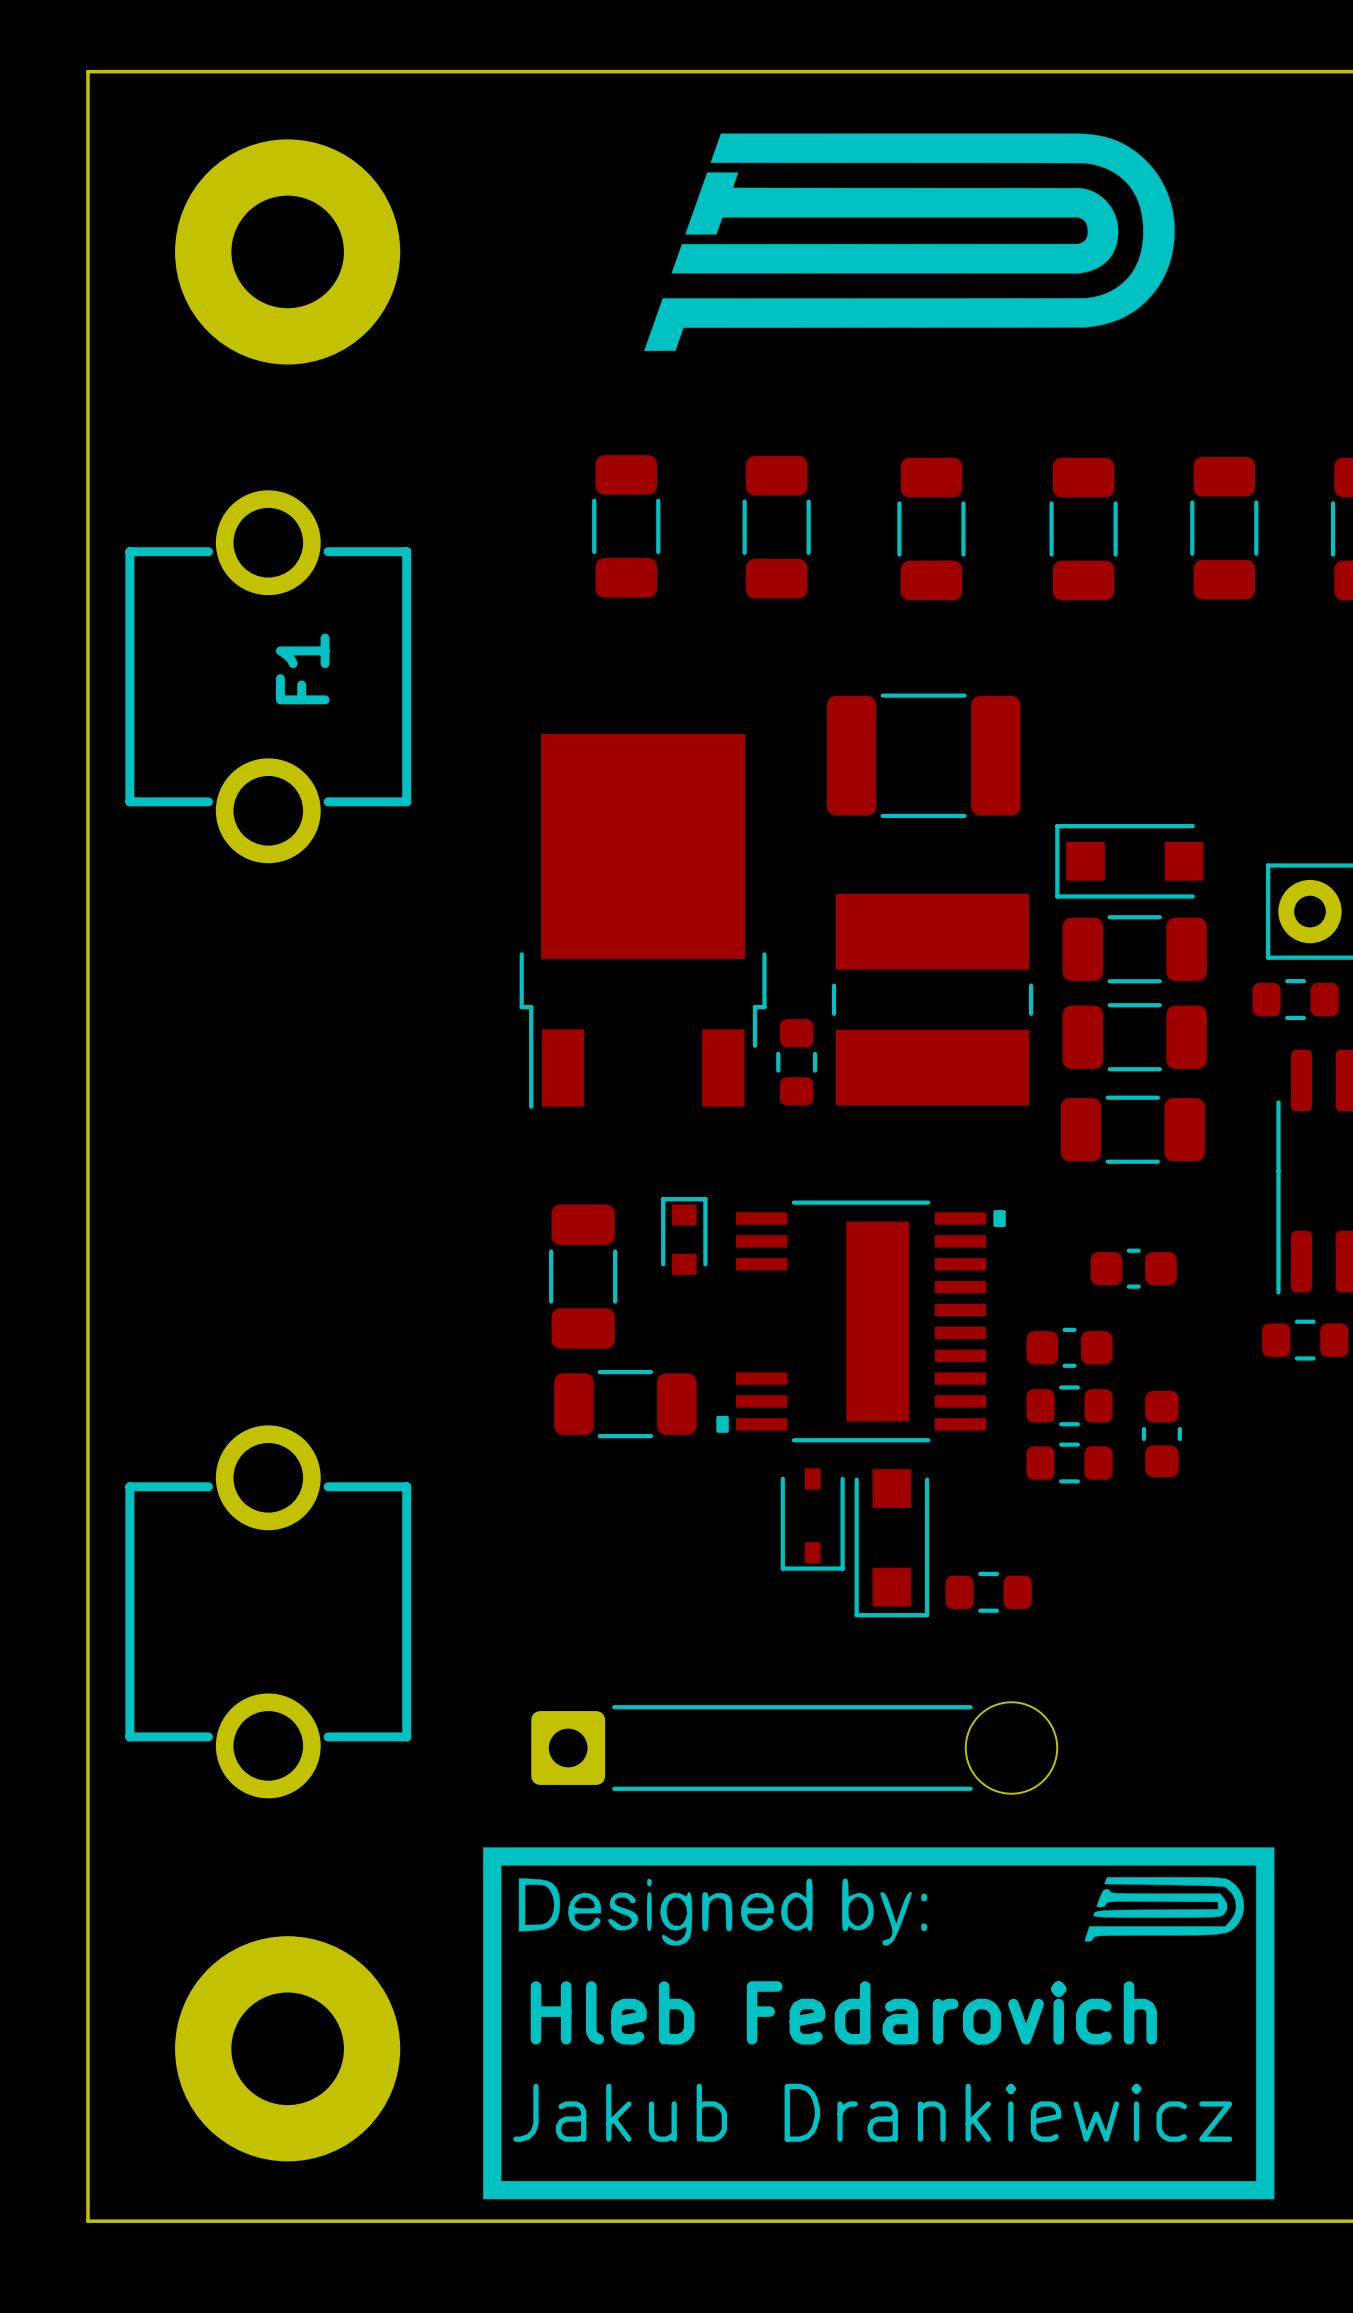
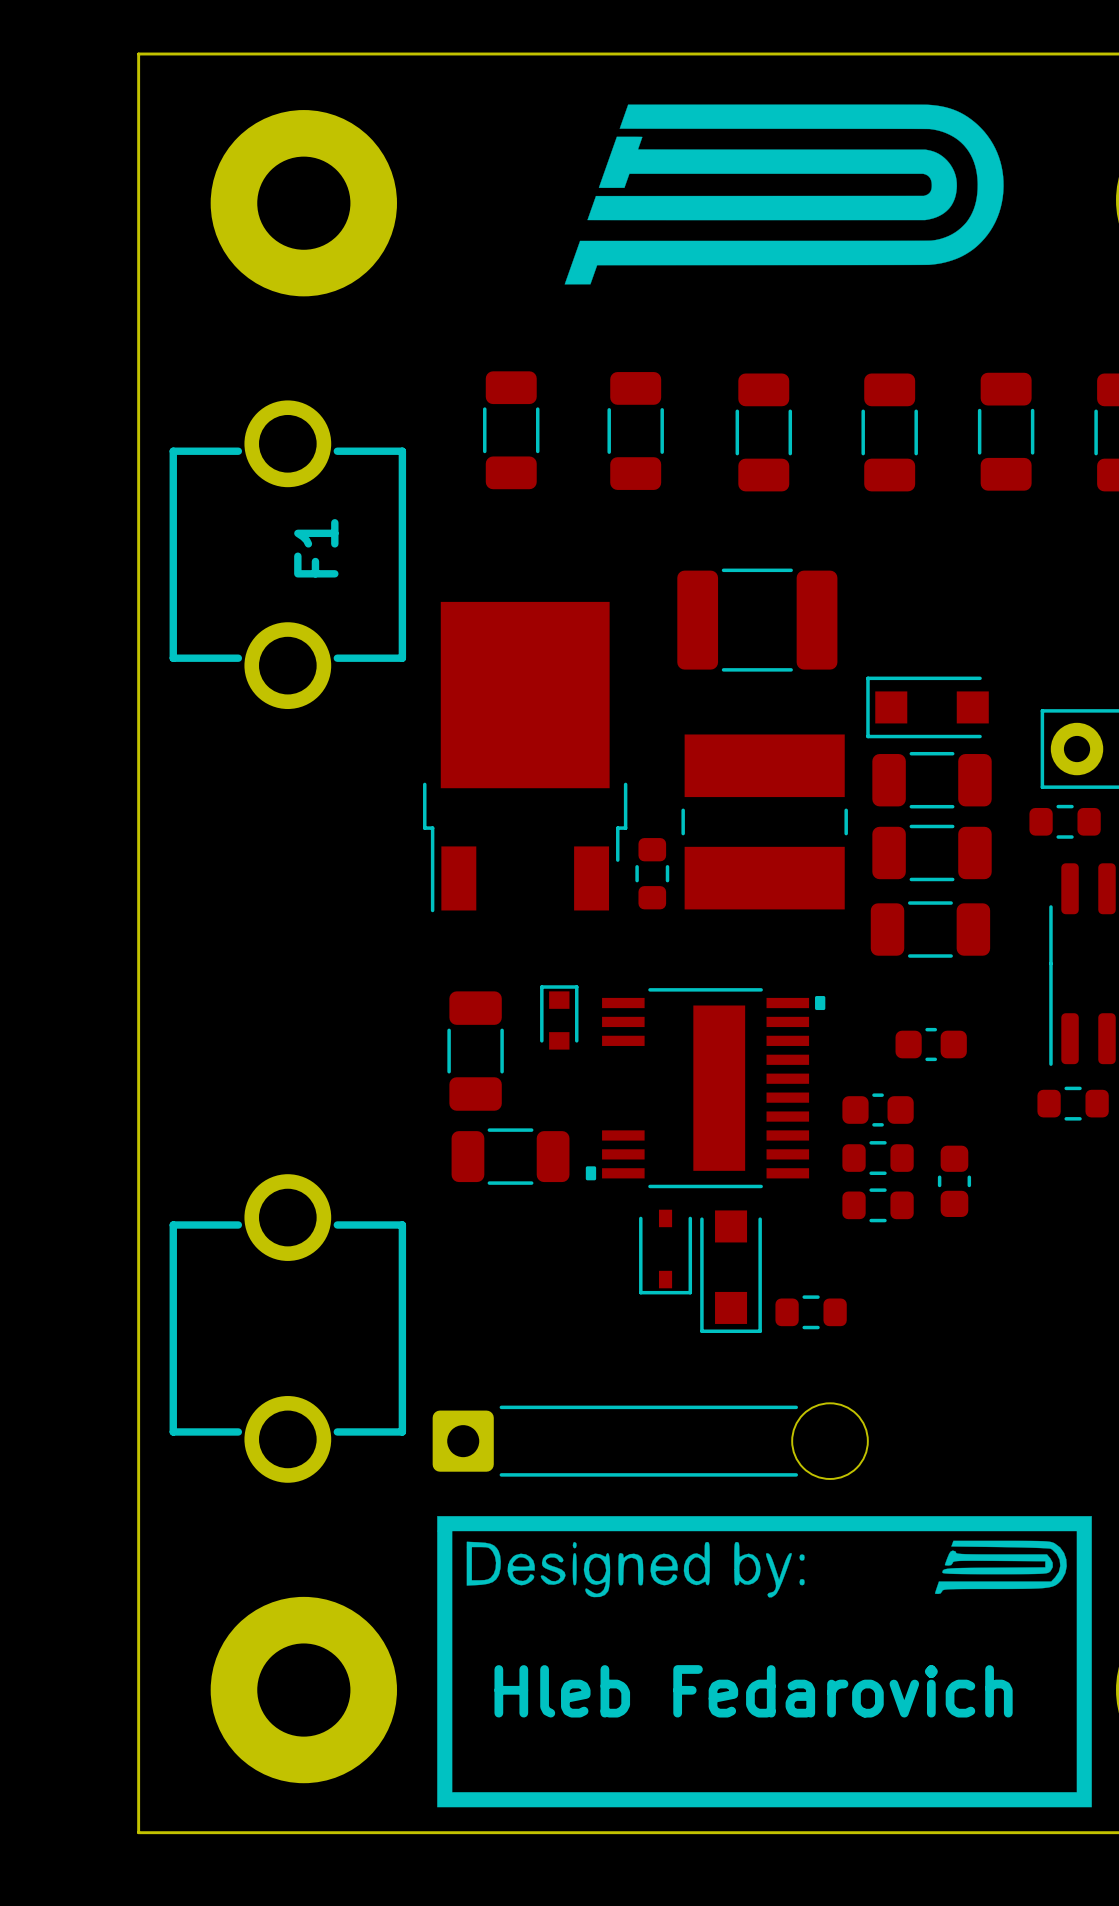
board edge: (175, 71) (87, 71) (87, 2221) (175, 2221) -> (138, 54) (138, 1832)
drawing position: (909, 242) -> (784, 194)
part position: (287, 251) -> (303, 203)
F1 position: (268, 1144) -> (287, 941)
drawing: none -> [437, 1516, 1092, 1808]
drawing: [483, 1847, 1275, 2200] -> none
part position: (287, 2048) -> (303, 1690)

